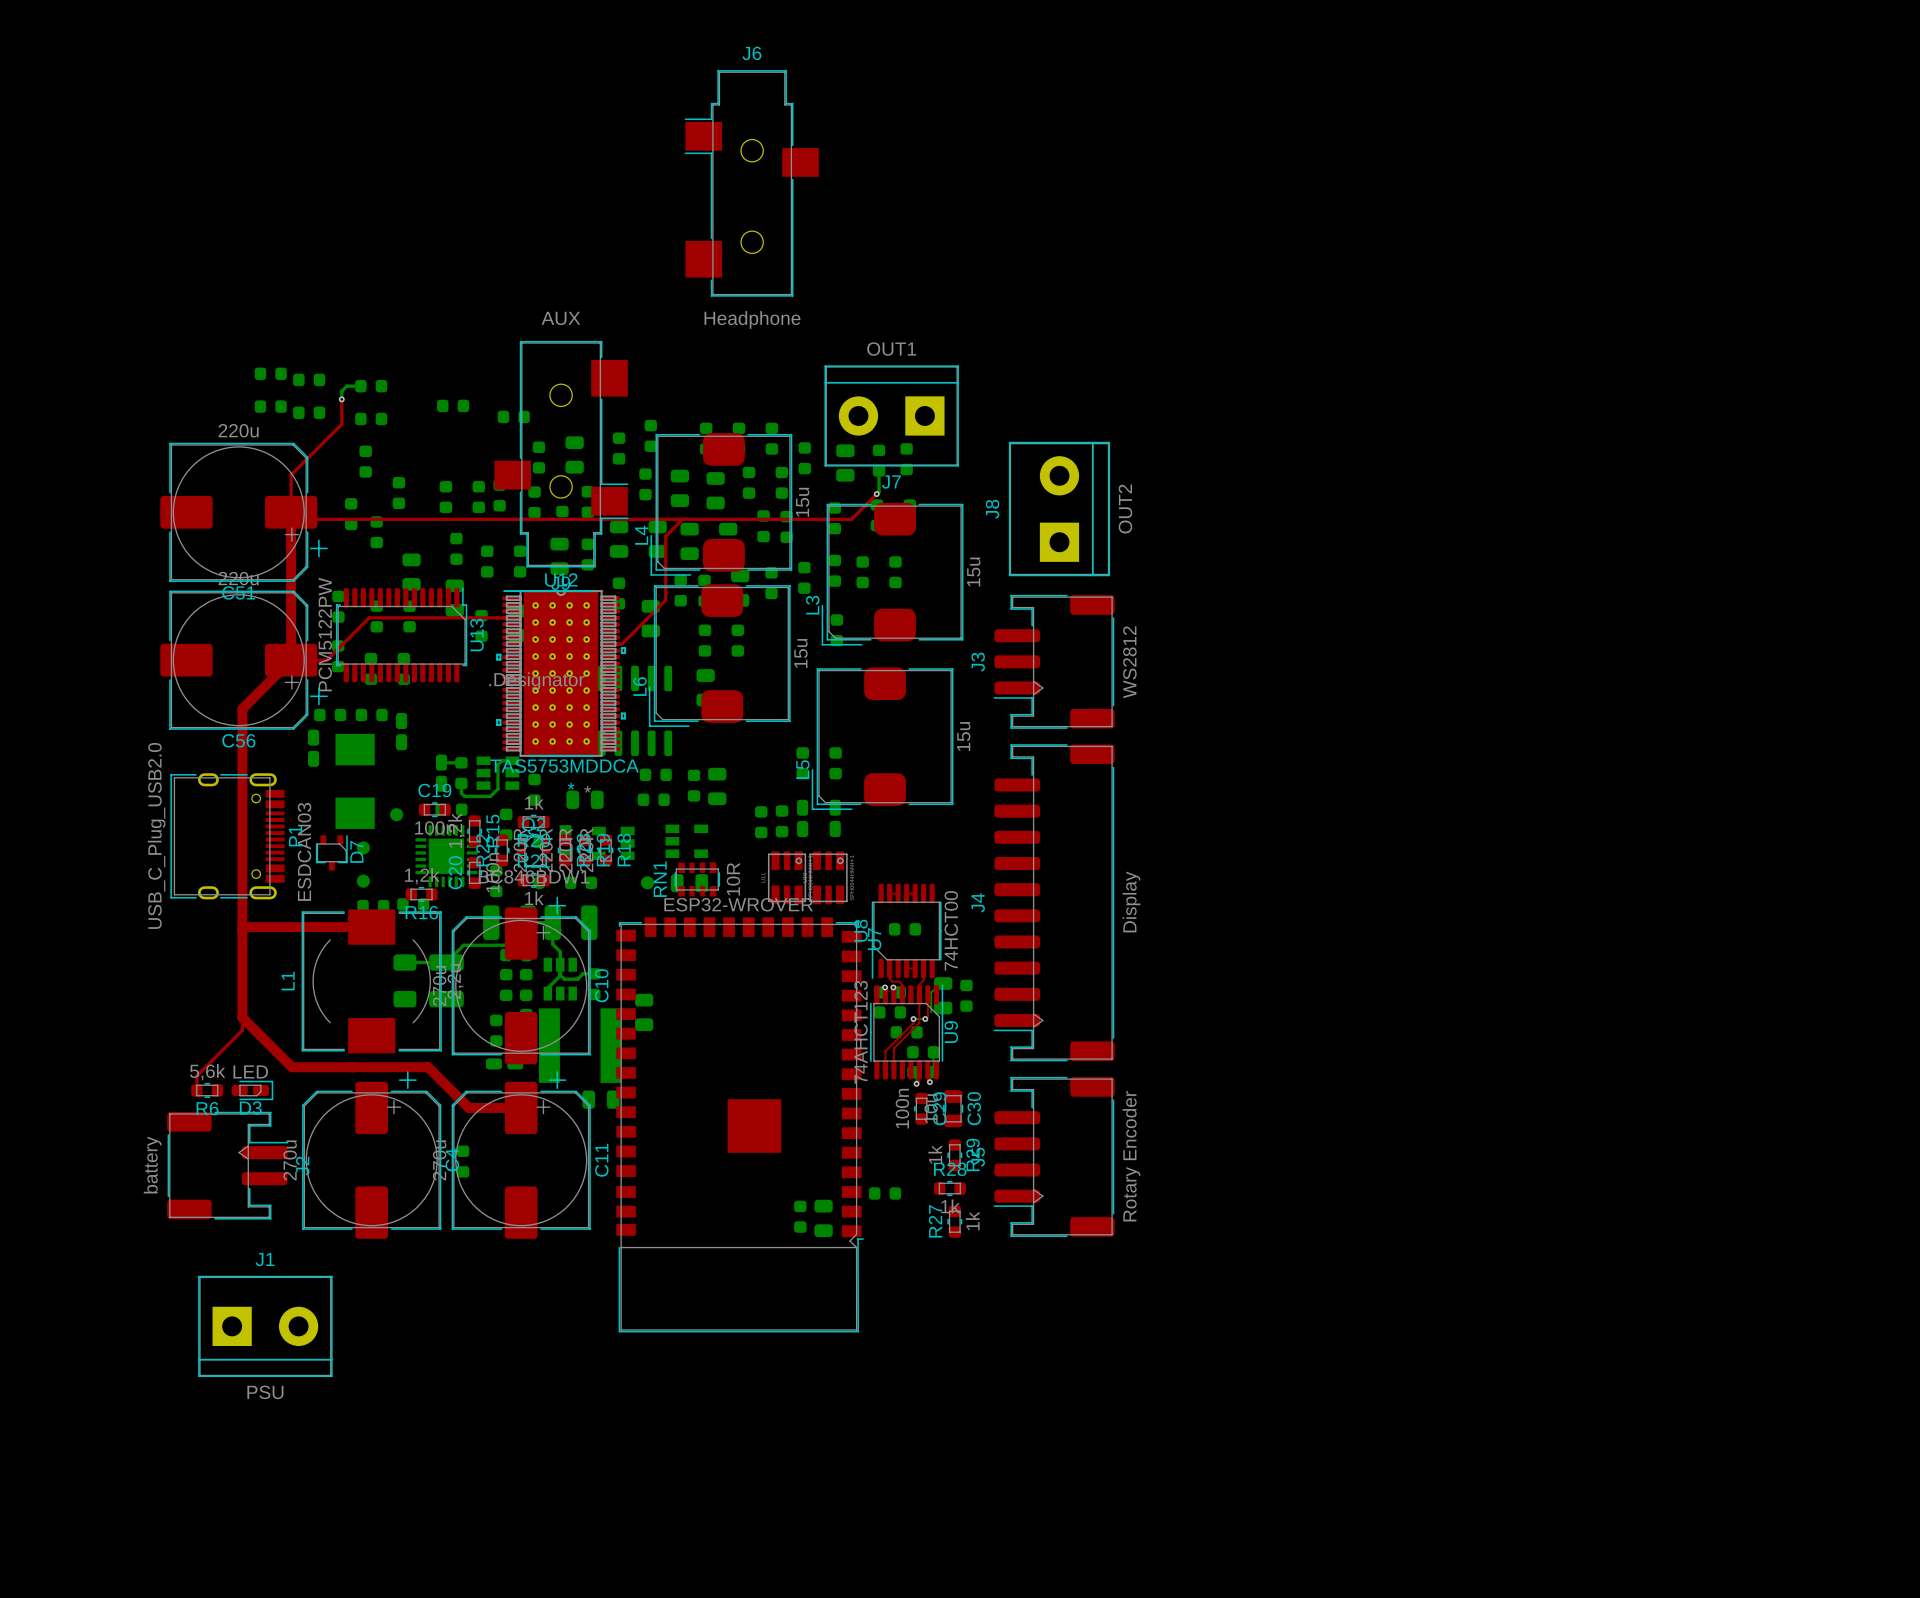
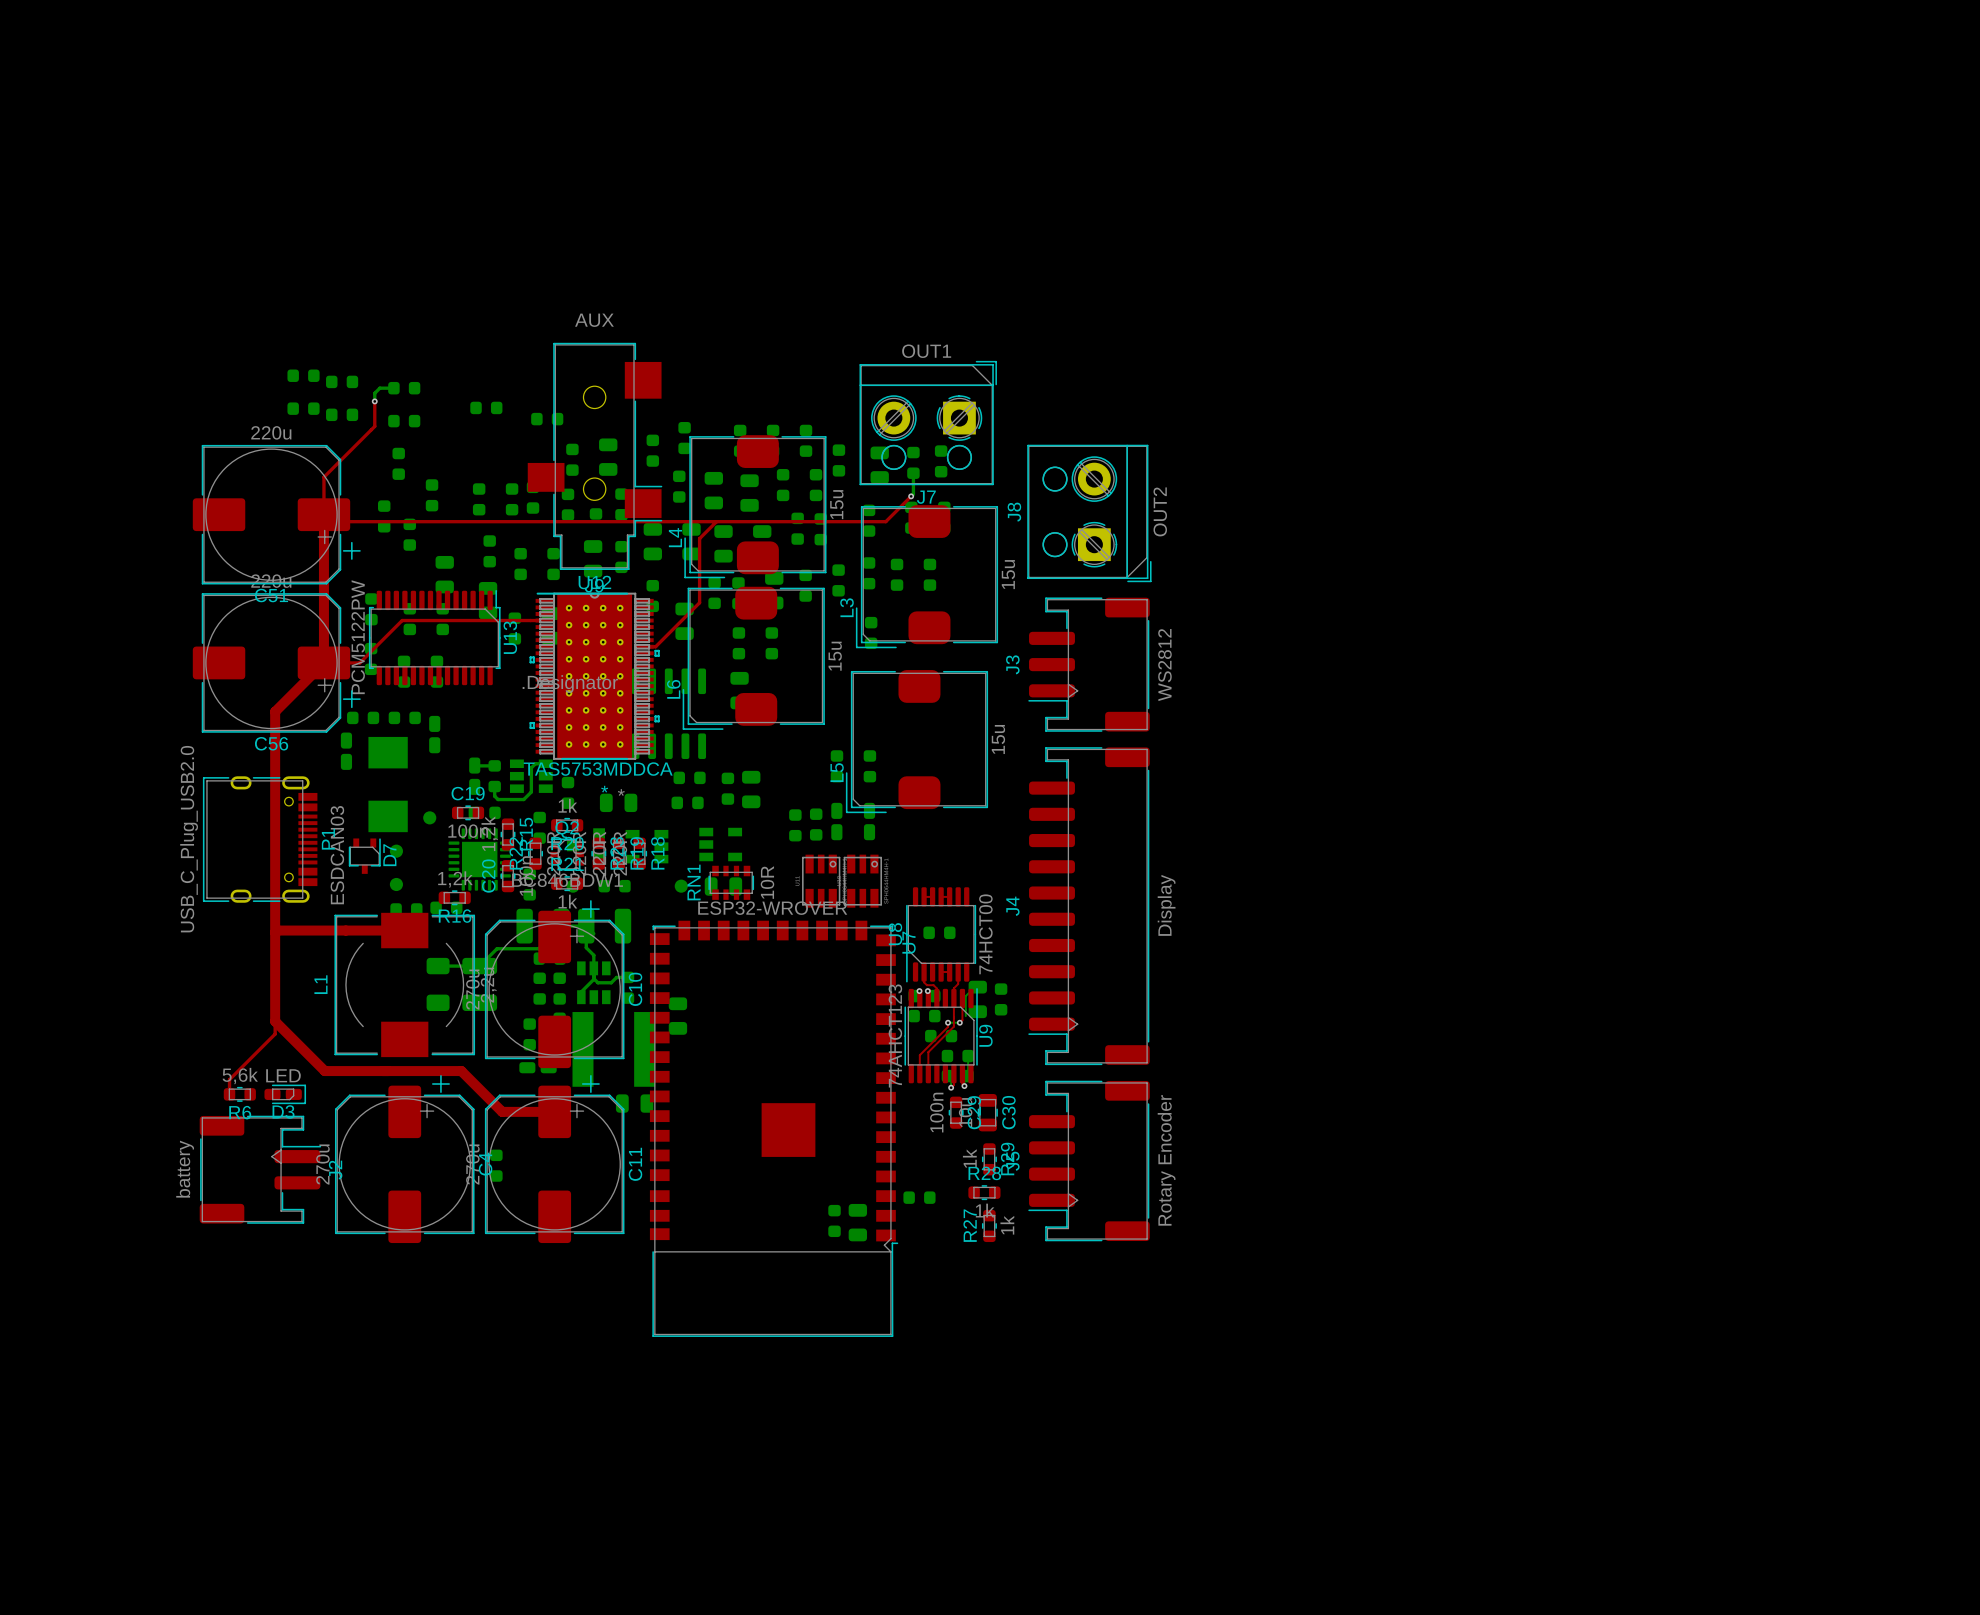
J6: Headphone (751, 183) -> none
J7 footprint: [824, 365, 959, 467] -> [859, 360, 997, 486]
J8 footprint: [1008, 441, 1111, 577] -> [1027, 444, 1152, 583]
J1: PSU (265, 1326) -> none

